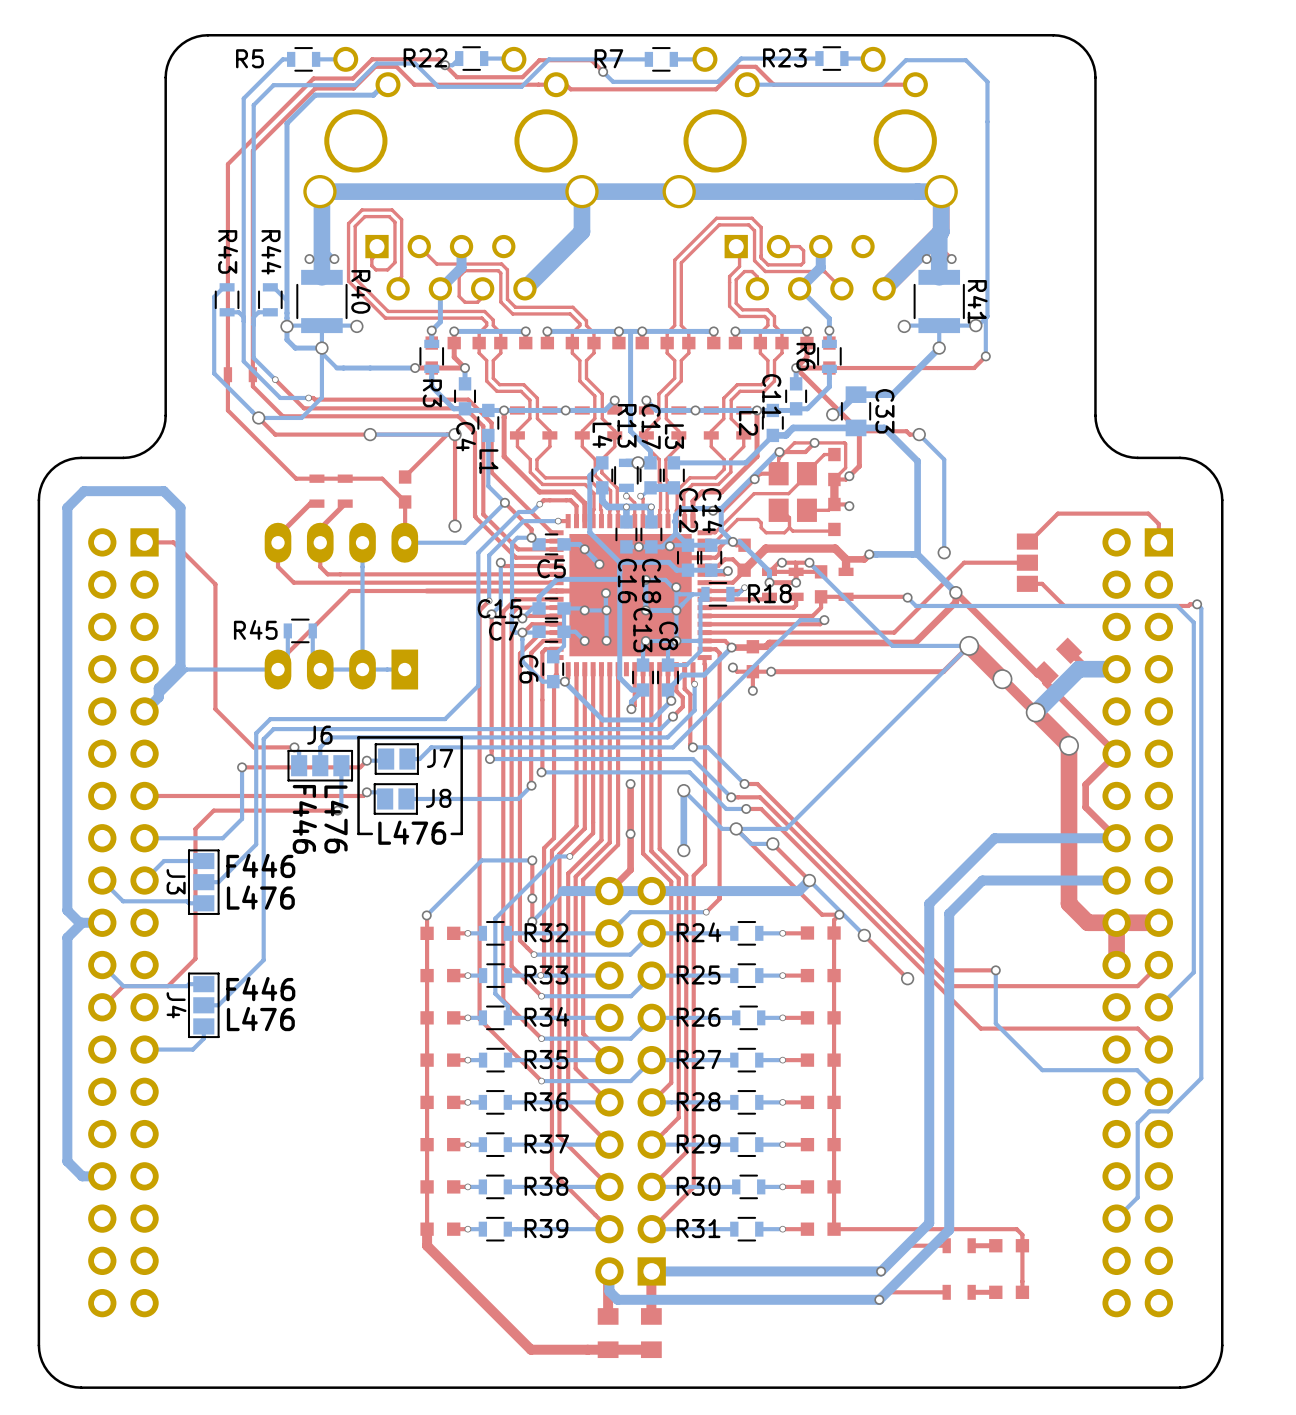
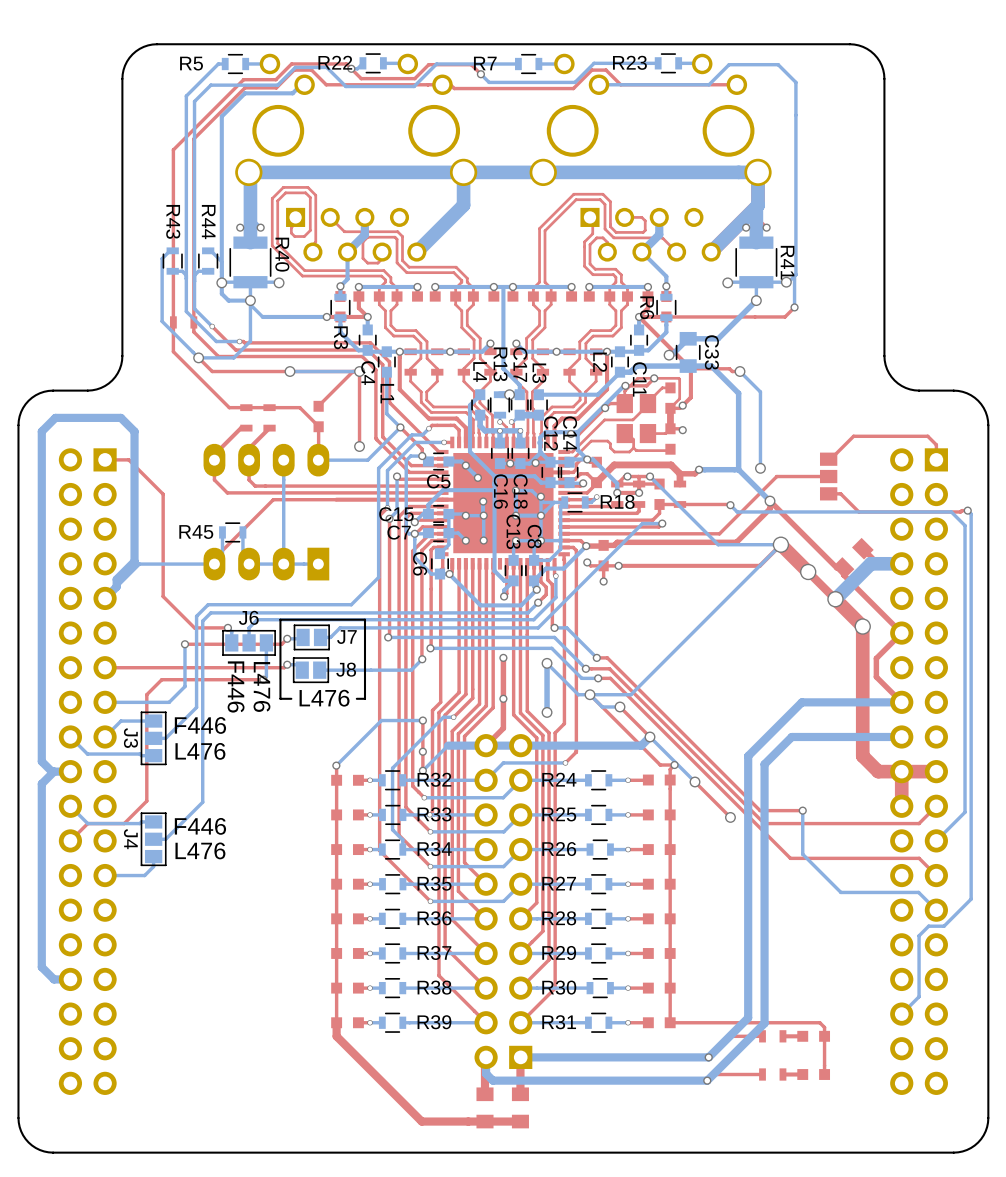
C11 name position: C11 (771, 396) -> C11 (639, 379)

